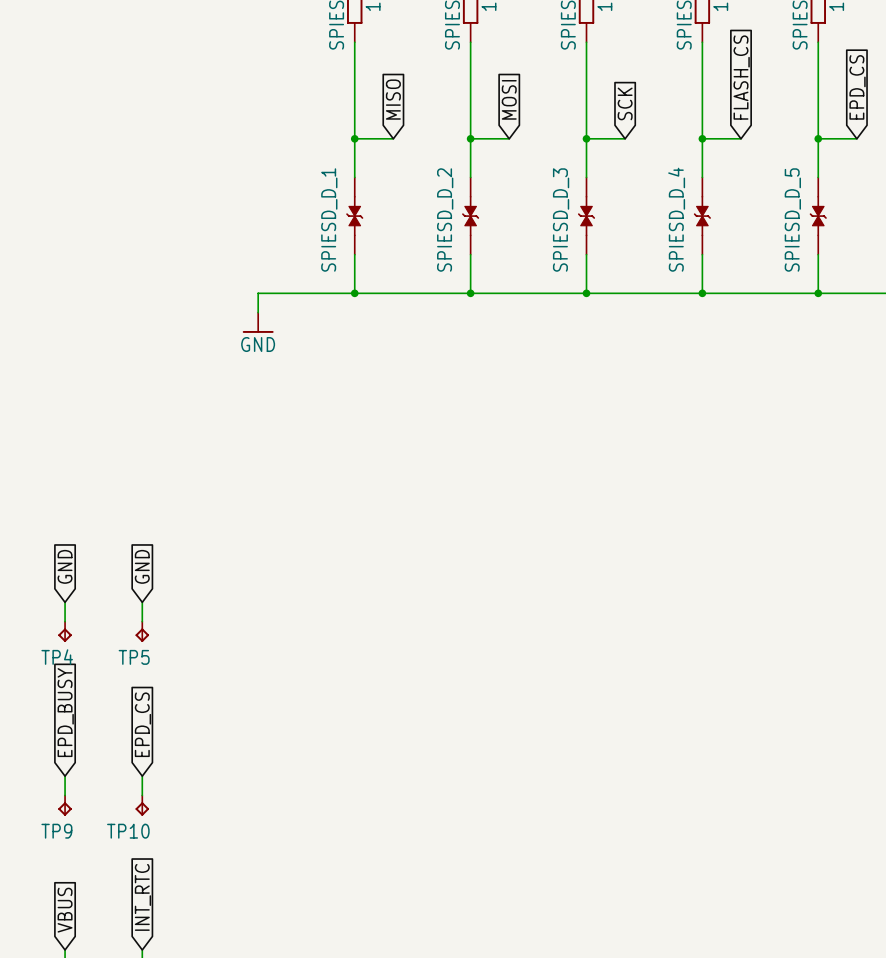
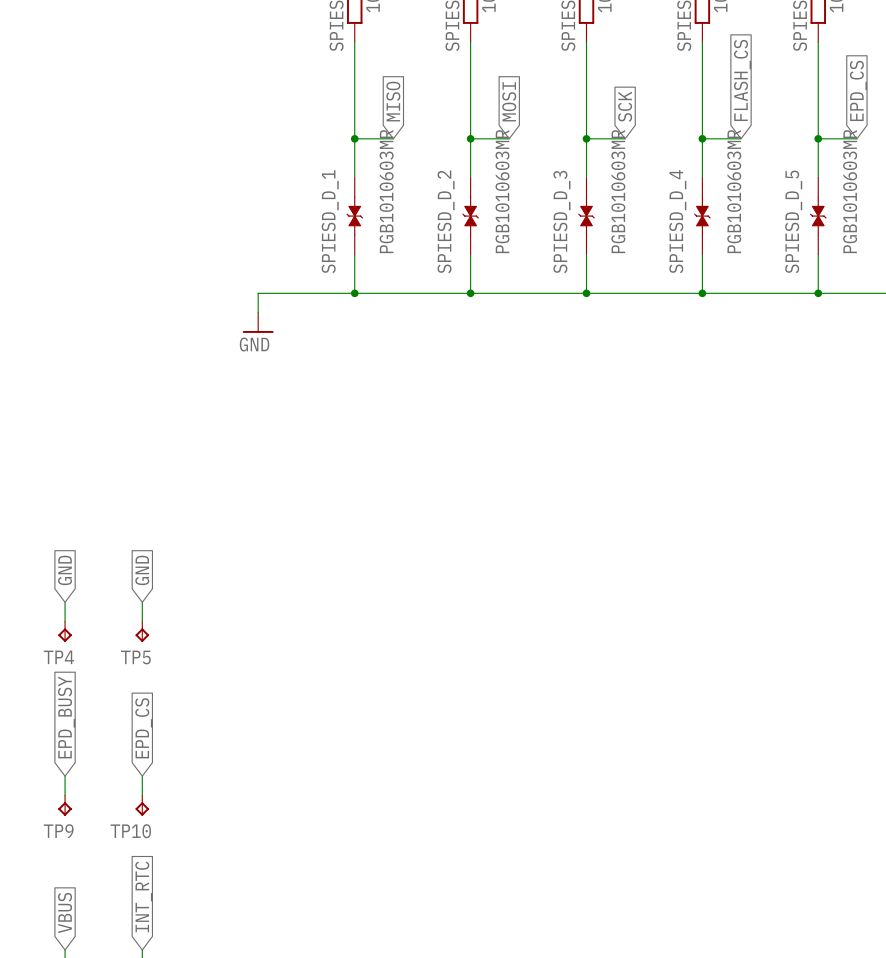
SPIESD_D_1 value: none -> PGB1010603MR (386, 191)
SPIESD_D_2 value: none -> PGB1010603MR (502, 191)
SPIESD_D_3 value: none -> PGB1010603MR (618, 191)
SPIESD_D_4 value: none -> PGB1010603MR (734, 191)
SPIESD_D_5 value: none -> PGB1010603MR (850, 191)

